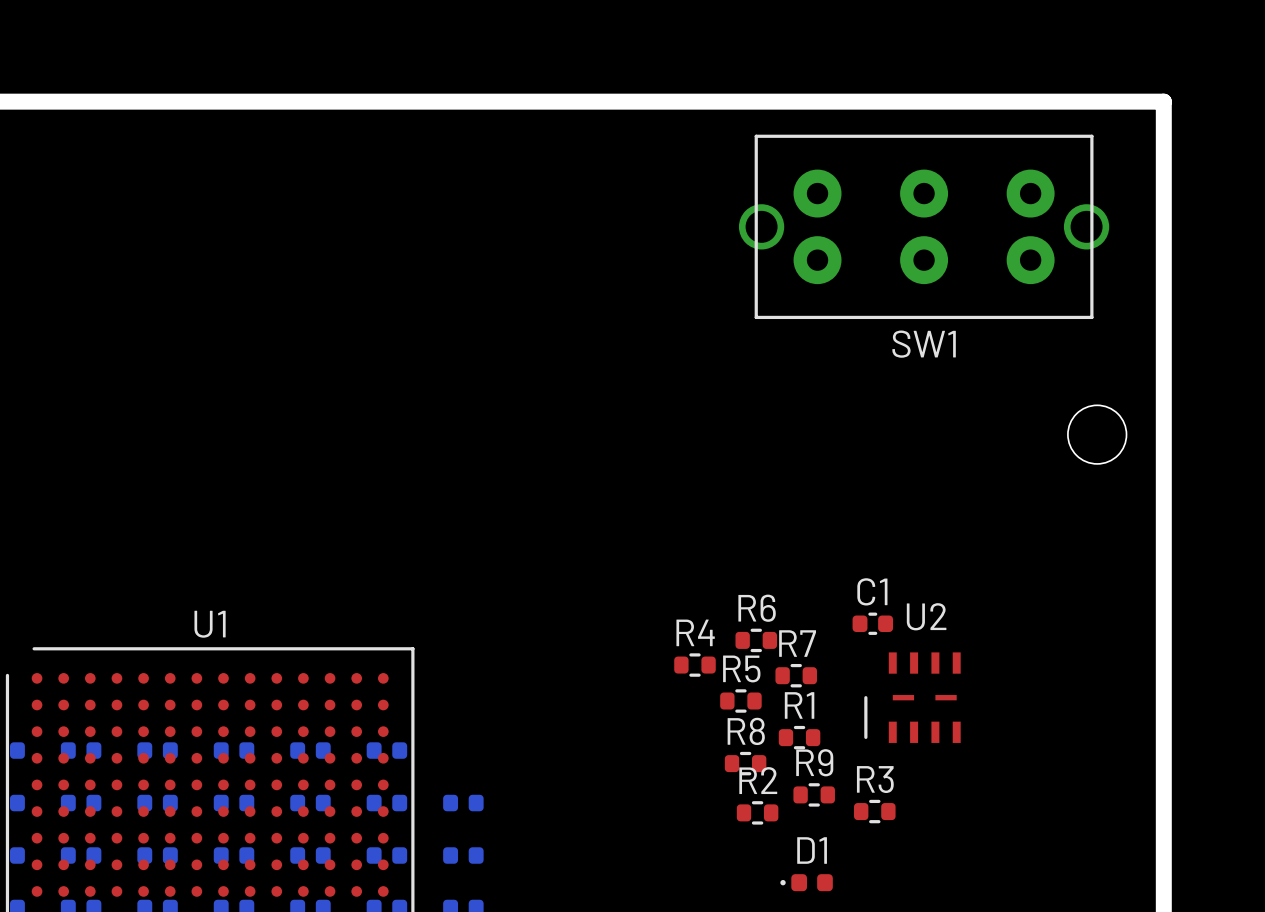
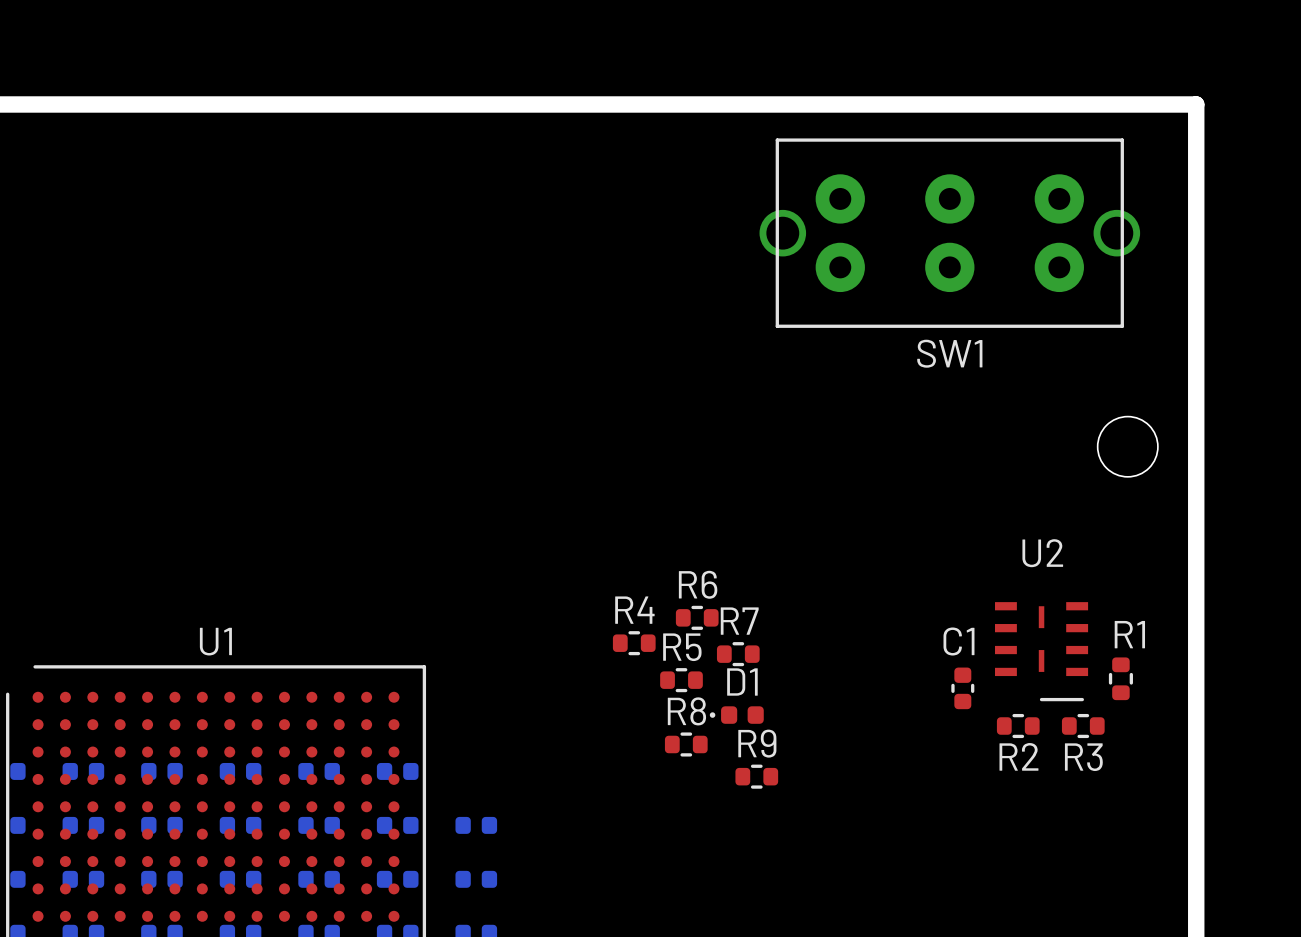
C1 rotation: 0° (872, 623) -> 90° clockwise (962, 688)
C1 position: (872, 623) -> (962, 688)
R6 position: (756, 640) -> (697, 617)
R4 position: (694, 665) -> (634, 643)
R7 position: (796, 675) -> (738, 654)
U2 rotation: 0° (912, 697) -> 90° counterclockwise (1041, 651)
U2 position: (912, 697) -> (1041, 651)
R5 position: (740, 701) -> (681, 680)
R1 rotation: 0° (799, 737) -> 90° clockwise (1120, 678)
R1 position: (799, 737) -> (1120, 678)
R8 position: (745, 763) -> (686, 744)
R3 name position: R3 (875, 779) -> R3 (1083, 757)
R2 name position: R2 (758, 780) -> R2 (1018, 756)
R9 position: (814, 794) -> (756, 776)
R3 position: (874, 811) -> (1083, 726)
R2 position: (757, 812) -> (1018, 726)
D1 position: (806, 882) -> (736, 715)

